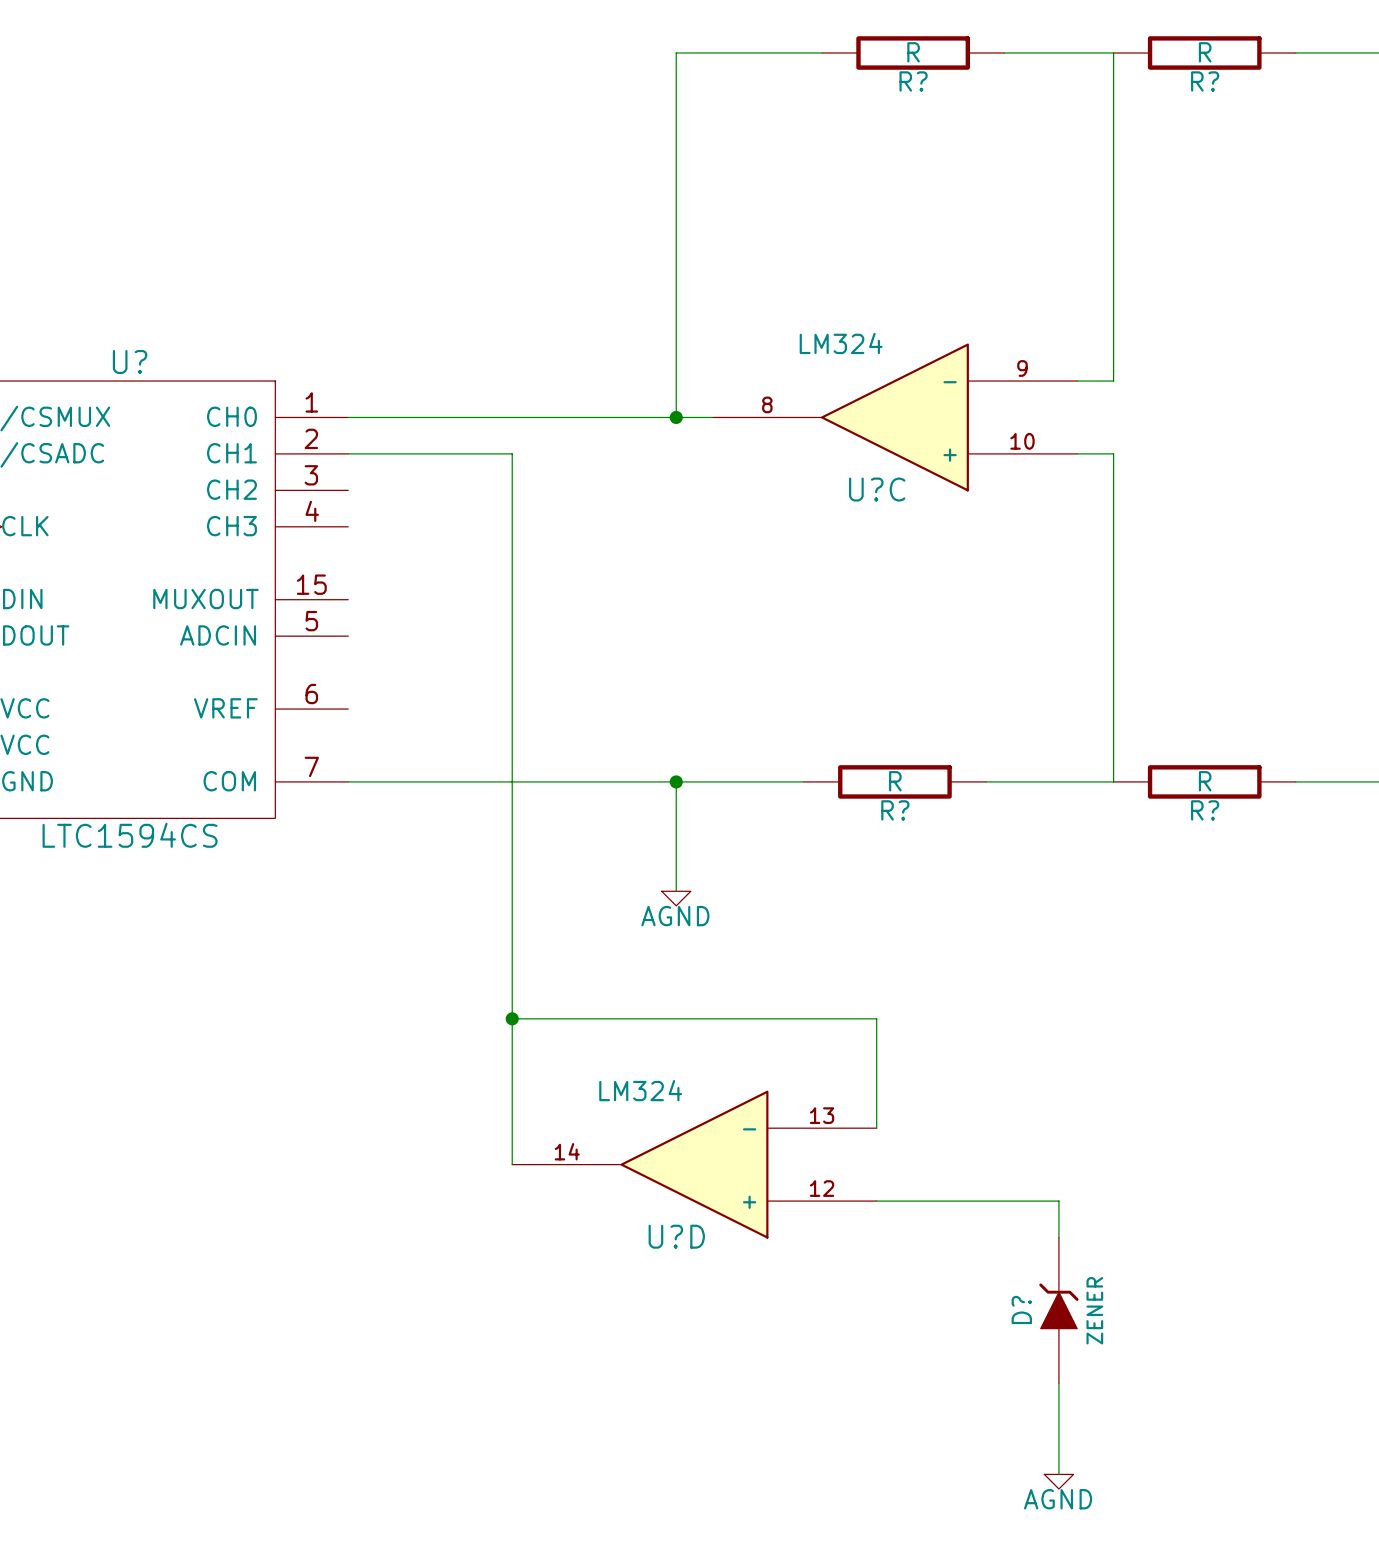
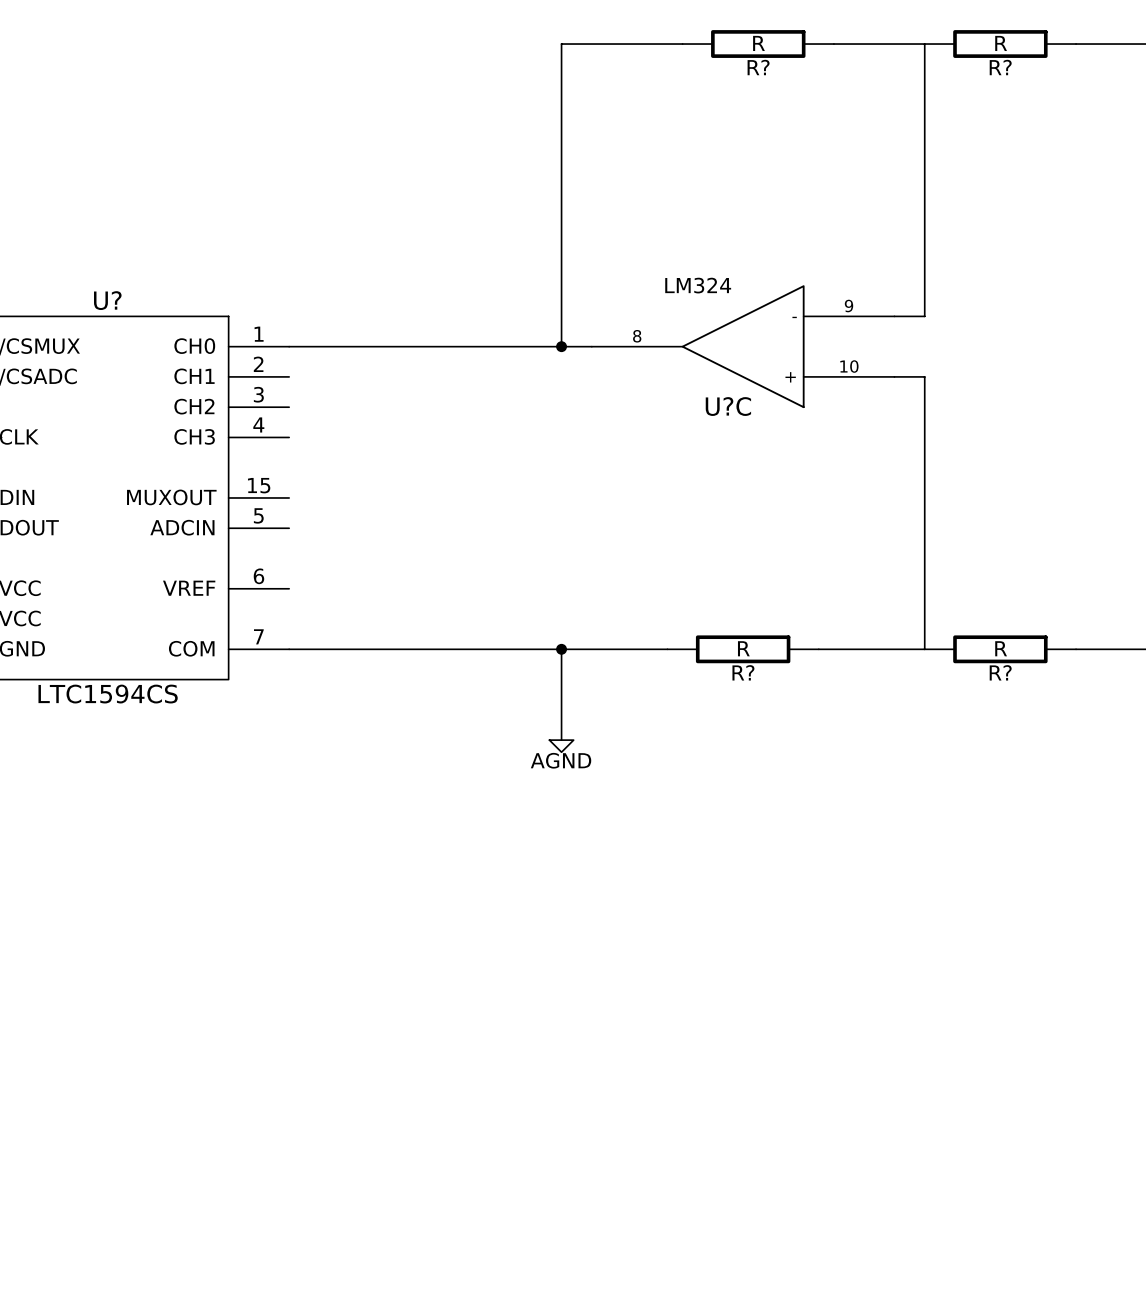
wire: (348, 453) (512, 453) (512, 1164) -> none
wire: (512, 1018) (876, 1018) (876, 1128) -> none
junction: (512, 1018) -> none
U?D: LM324 (694, 1164) -> none
wire: (876, 1201) (1058, 1201) (1058, 1237) -> none
D?: ZENER (1058, 1310) -> none
wire: (1058, 1383) (1058, 1474) -> none
power symbol: AGND (1058, 1481) -> none

